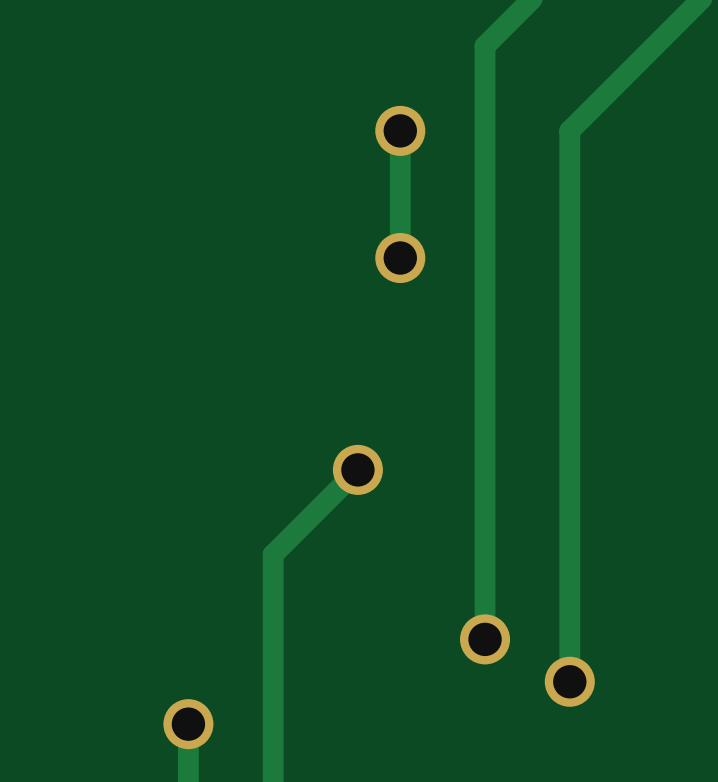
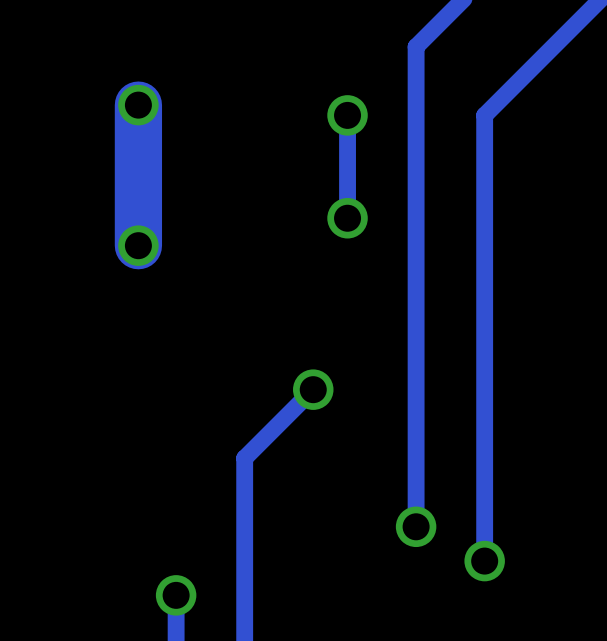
track: none -> (138, 105) (138, 245)
via: none -> (138, 105)
via: none -> (138, 245)

